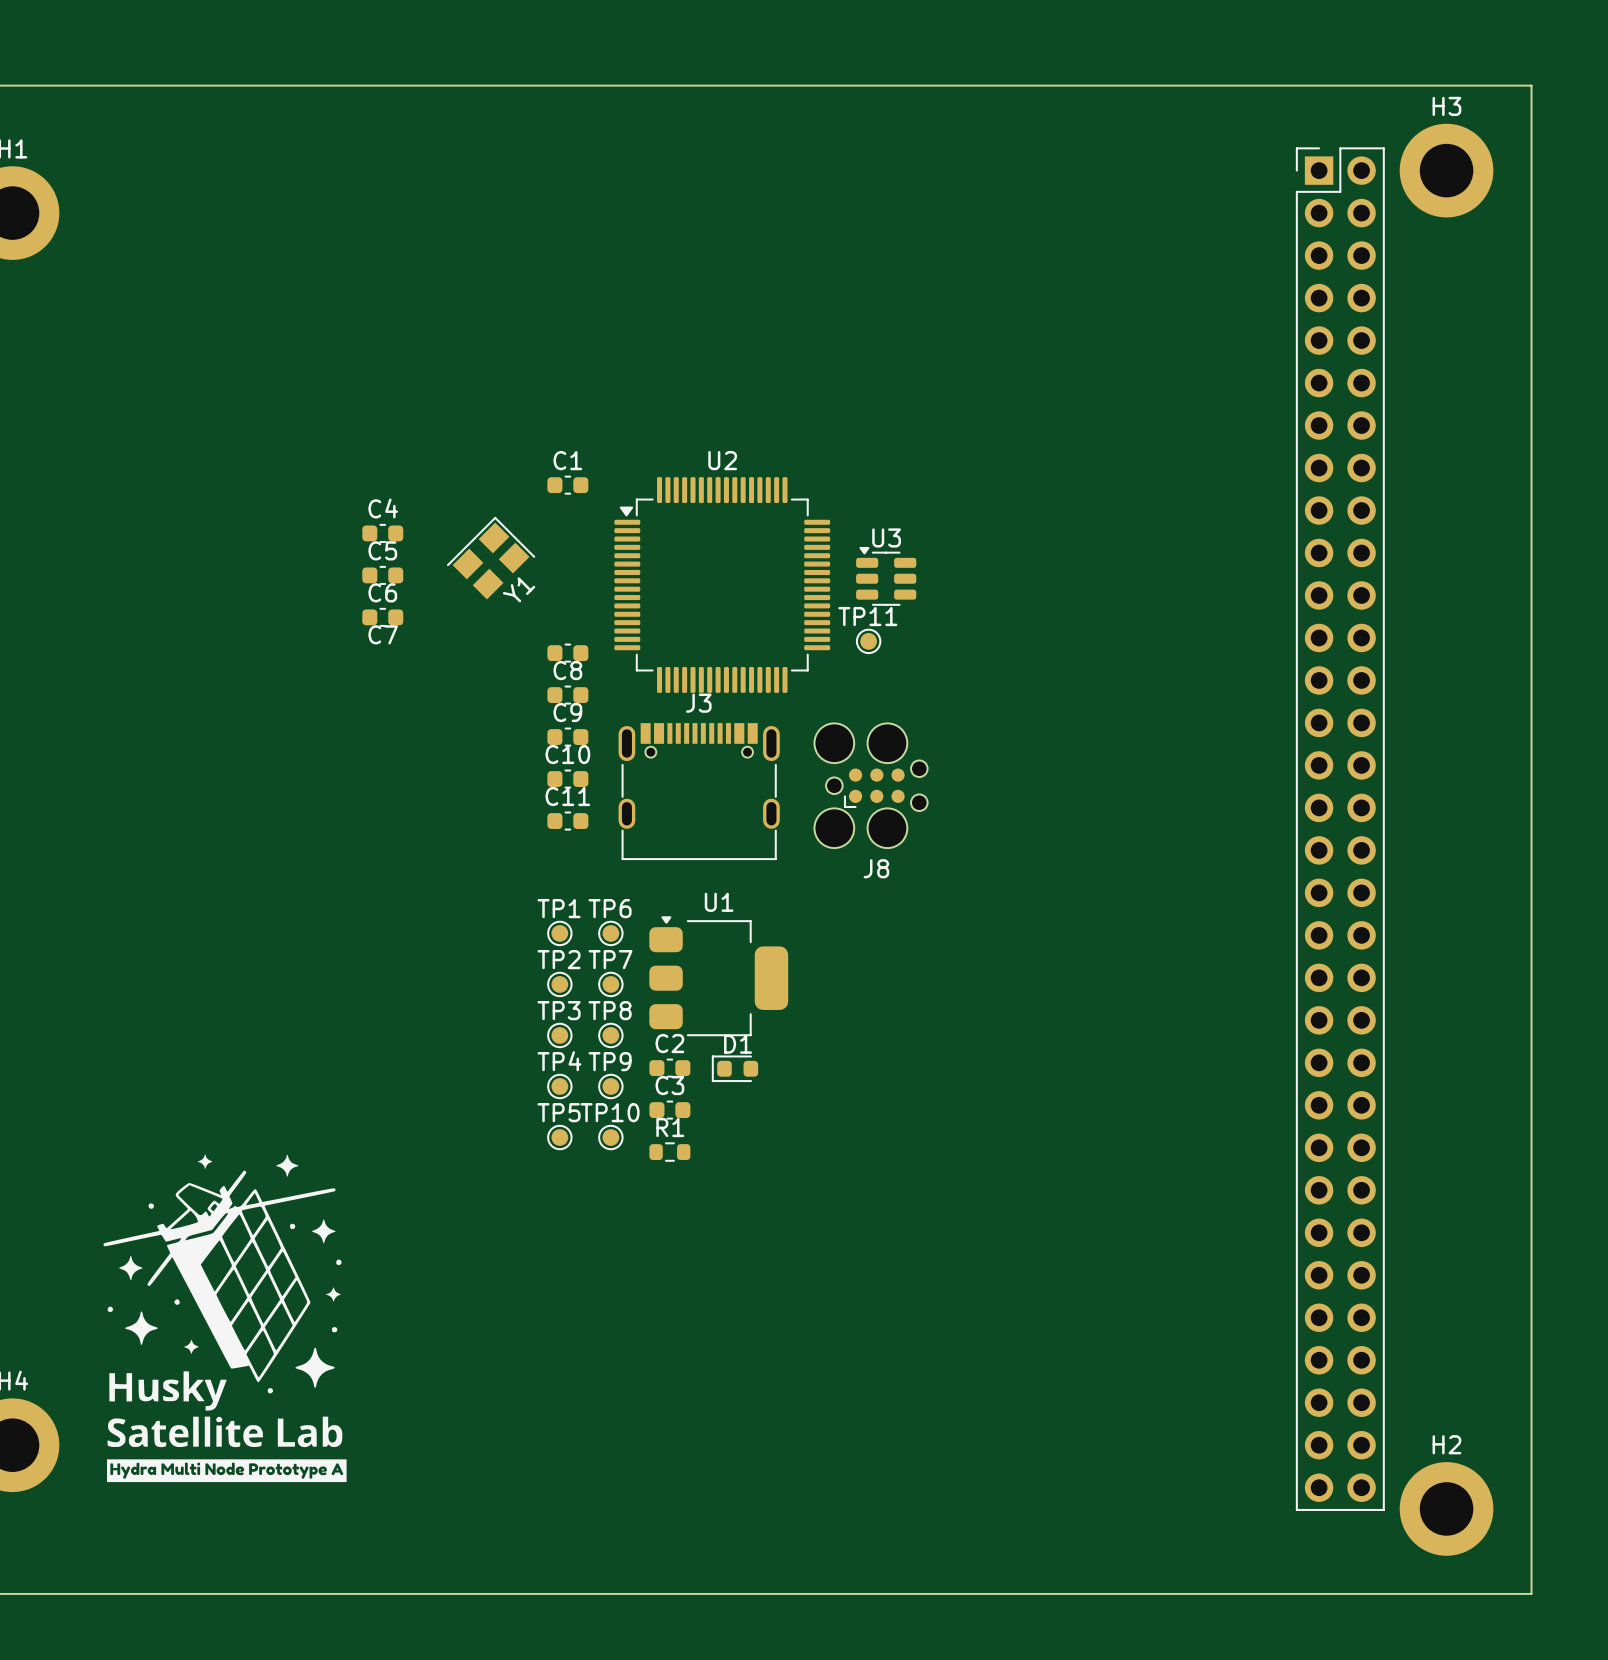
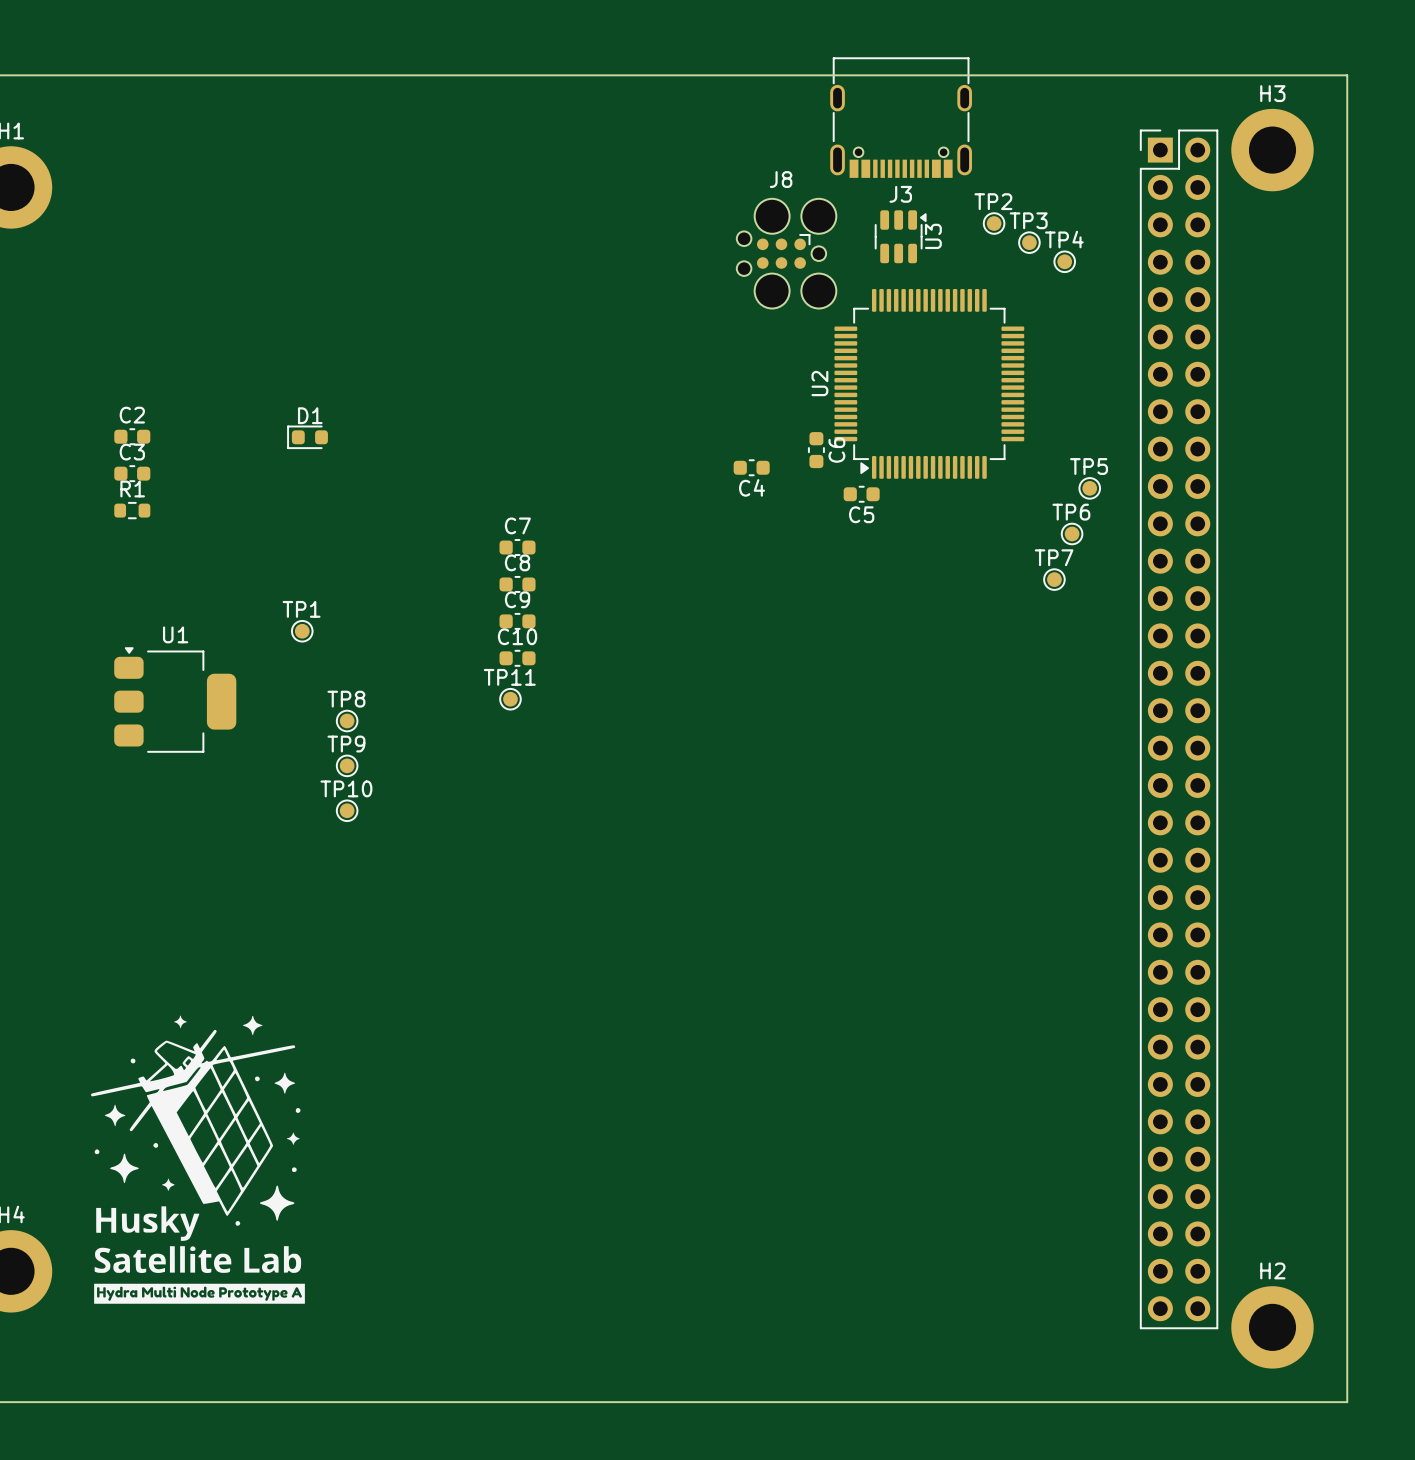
C1: (567, 485) -> none
C4 name position: C4 (383, 508) -> C4 (752, 487)
C4 position: (382, 533) -> (751, 467)
C5 name position: C5 (382, 550) -> C5 (861, 514)
Y1: (491, 558) -> none
C5 position: (382, 575) -> (861, 494)
U3 rotation: 0° (886, 576) -> 90° clockwise (900, 236)
U3 position: (886, 576) -> (900, 236)
U2 rotation: 0° (722, 585) -> 90° counterclockwise (929, 383)
U2 position: (722, 585) -> (929, 383)
C6 rotation: 0° (382, 617) -> 90° clockwise (816, 450)
C6 position: (382, 617) -> (816, 450)
C7 name position: C7 (383, 634) -> C7 (517, 525)
TP11 position: (868, 641) -> (510, 699)
C7 position: (567, 653) -> (517, 547)
C8 position: (567, 695) -> (517, 584)
C9 position: (567, 737) -> (517, 621)
C10 position: (567, 779) -> (517, 658)
J8 rotation: 0° (871, 785) -> 180° (786, 253)
J8 position: (871, 785) -> (786, 253)
J3 rotation: 0° (699, 791) -> 180° (901, 117)
J3 position: (699, 791) -> (901, 117)
C11: (567, 821) -> none
TP1 position: (559, 933) -> (302, 631)
TP6 position: (610, 933) -> (1072, 533)
U1 position: (718, 976) -> (175, 699)
TP2 position: (559, 984) -> (994, 223)
TP7 position: (610, 984) -> (1054, 579)
TP3 position: (559, 1035) -> (1029, 242)
TP8 position: (610, 1035) -> (347, 721)
C2 position: (669, 1068) -> (132, 436)
D1 position: (734, 1068) -> (307, 437)
TP4 position: (559, 1086) -> (1064, 261)
TP9 position: (610, 1086) -> (347, 765)
C3 position: (669, 1110) -> (132, 473)
TP5 position: (559, 1137) -> (1089, 488)
TP10 position: (610, 1137) -> (347, 810)
R1 position: (669, 1152) -> (132, 510)

